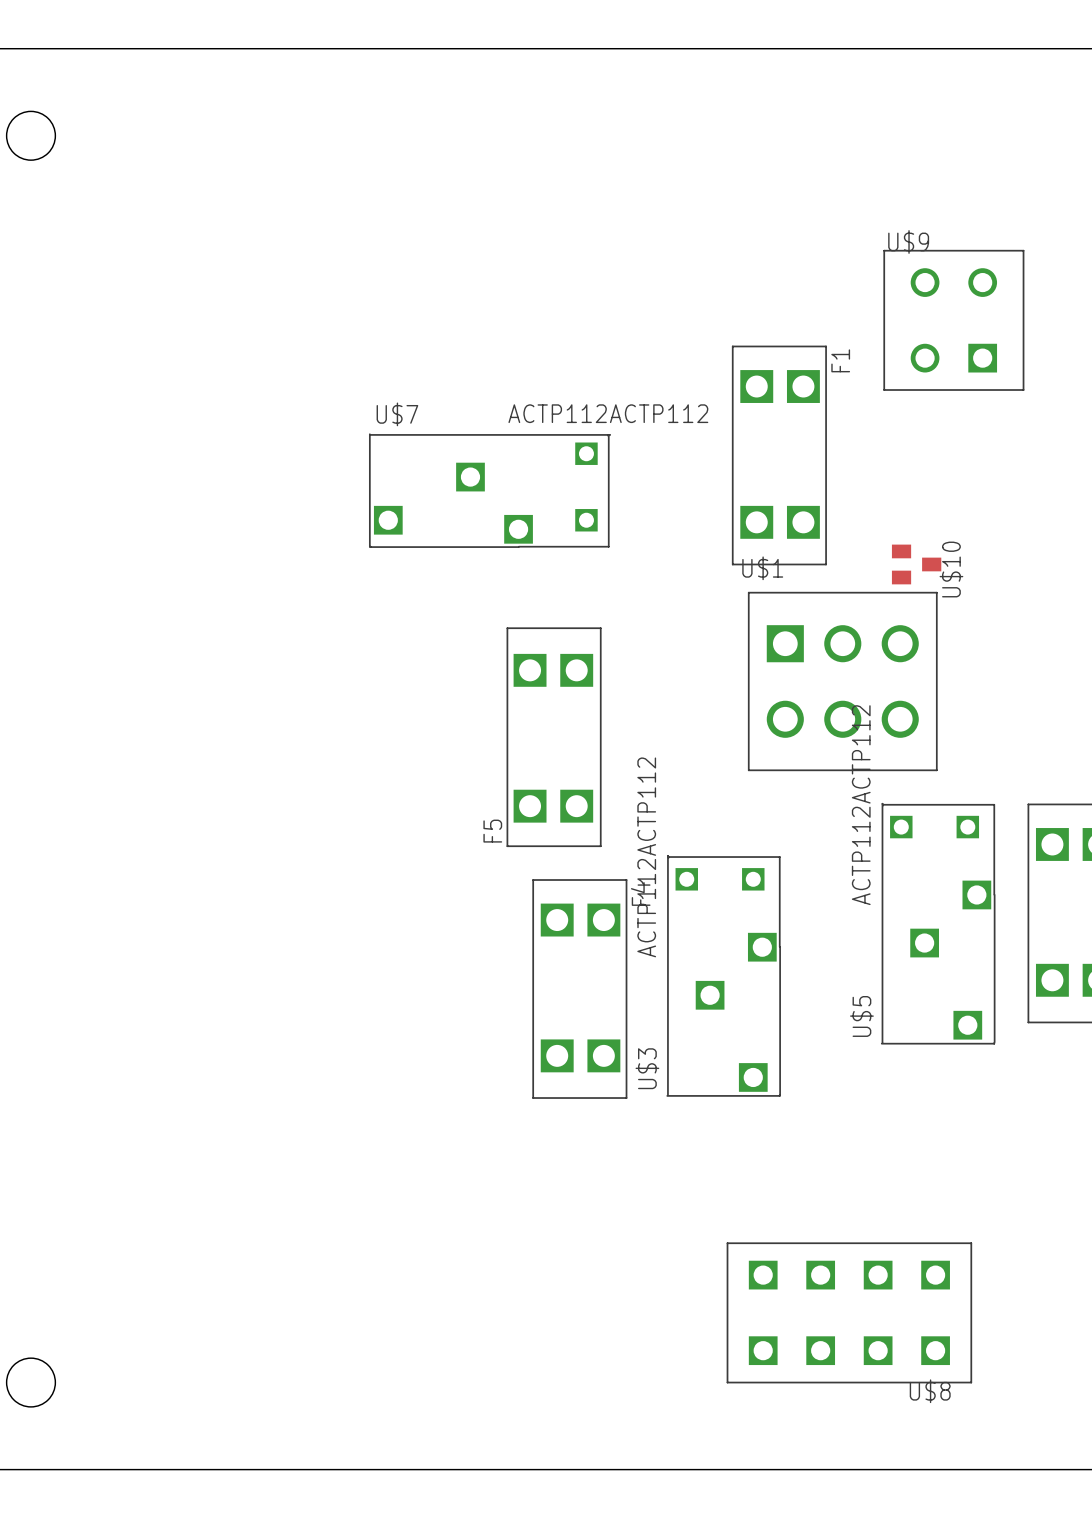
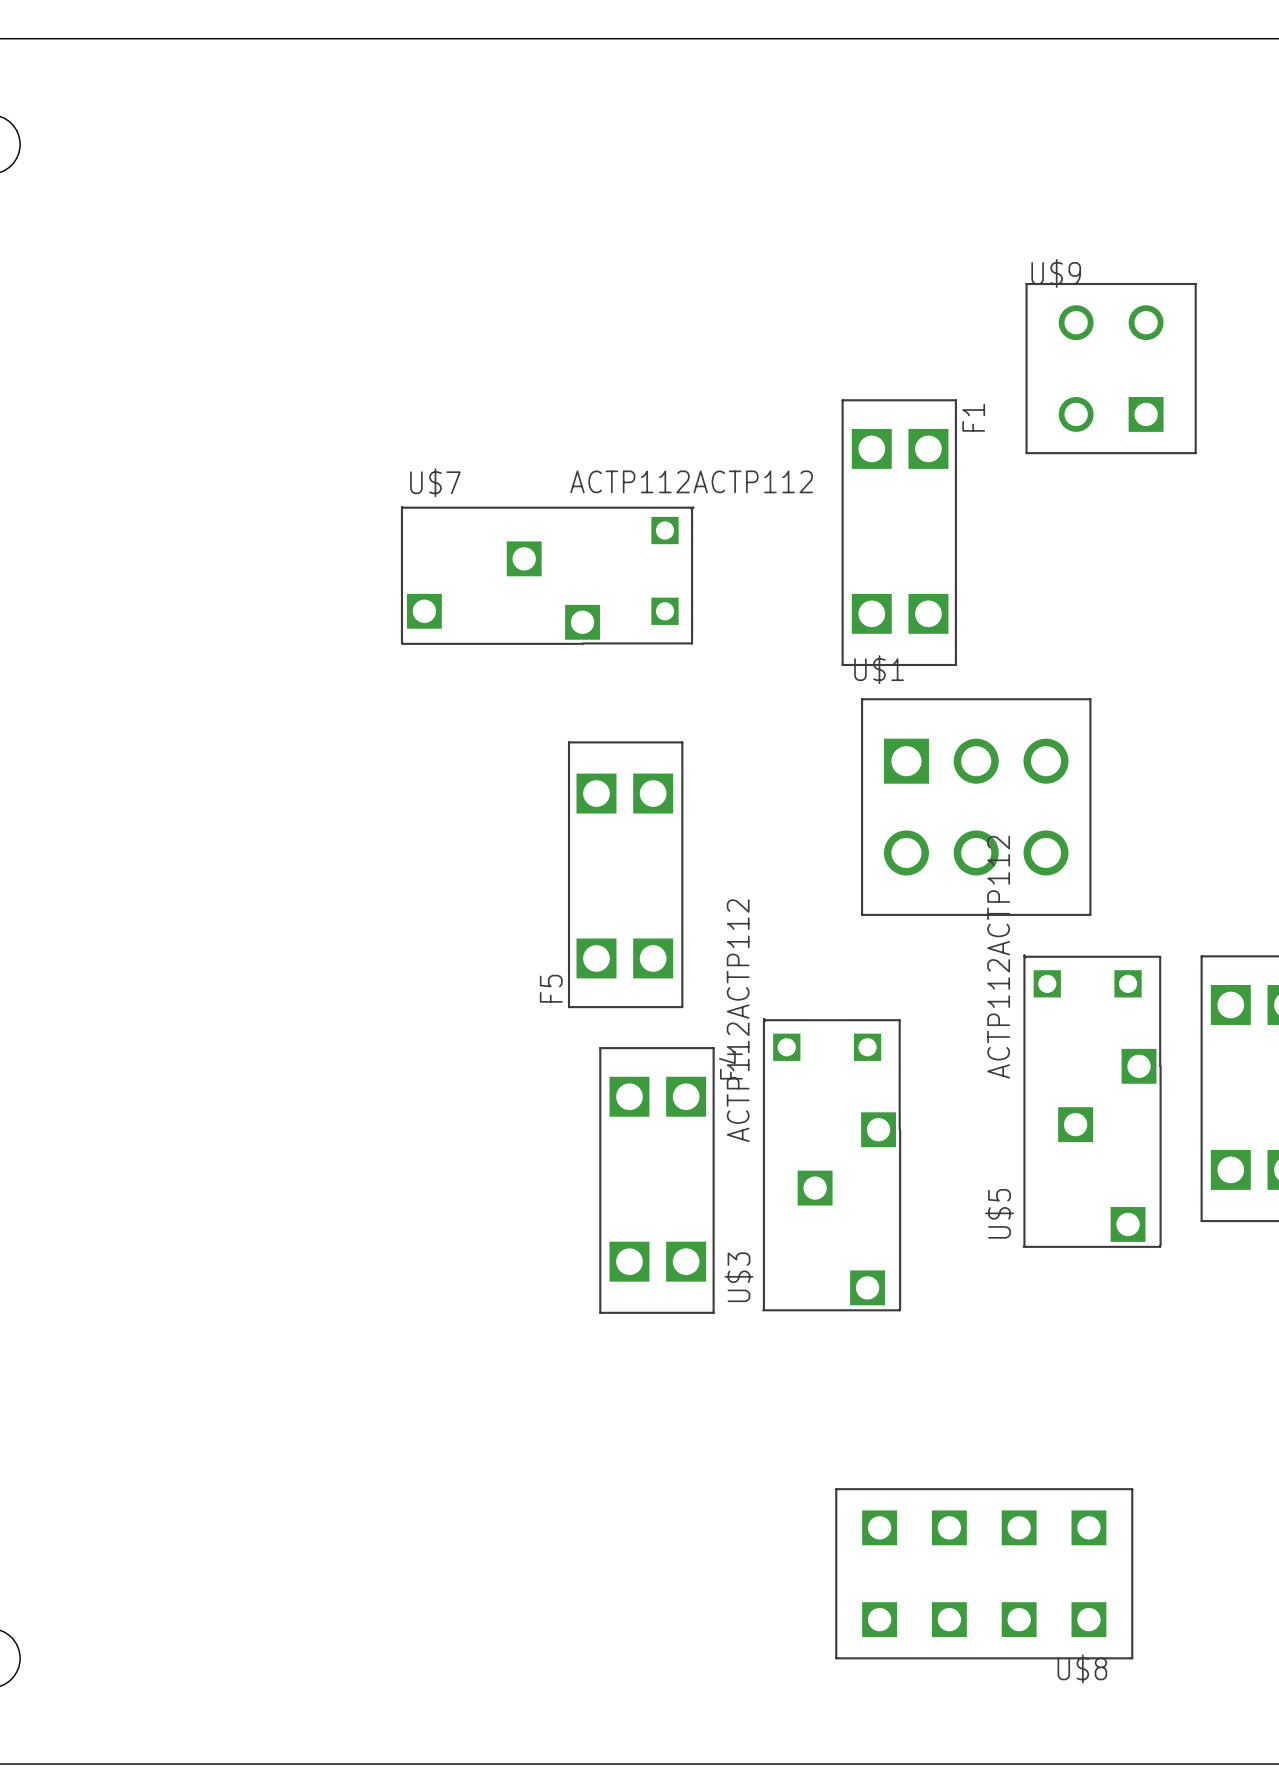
U$10: (916, 564) -> none

